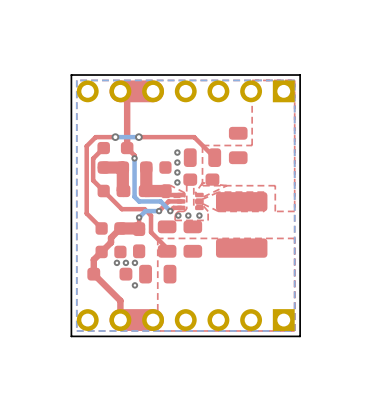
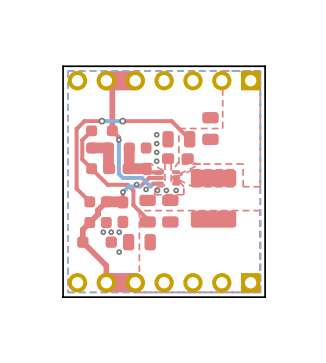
via: none -> (136, 184)
via: (159, 211) -> none
via: (170, 211) -> none
via: none -> (146, 189)

